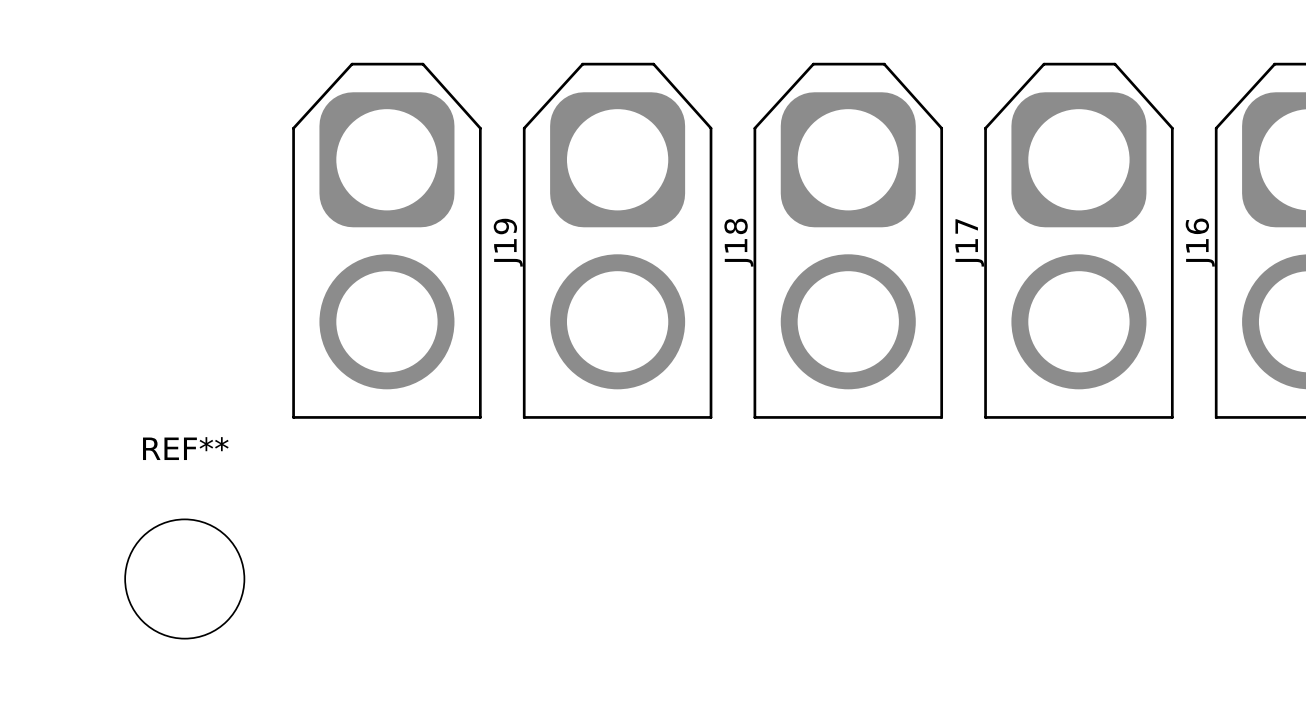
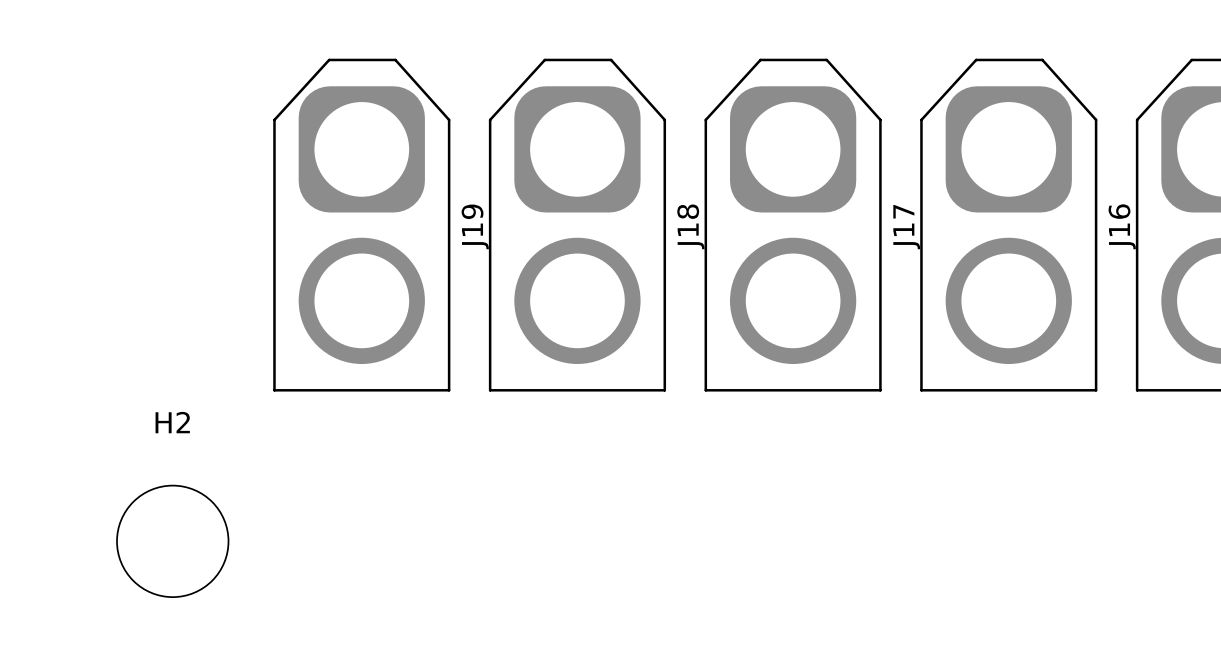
REF** name: REF** (185, 448) -> H2 (172, 422)

